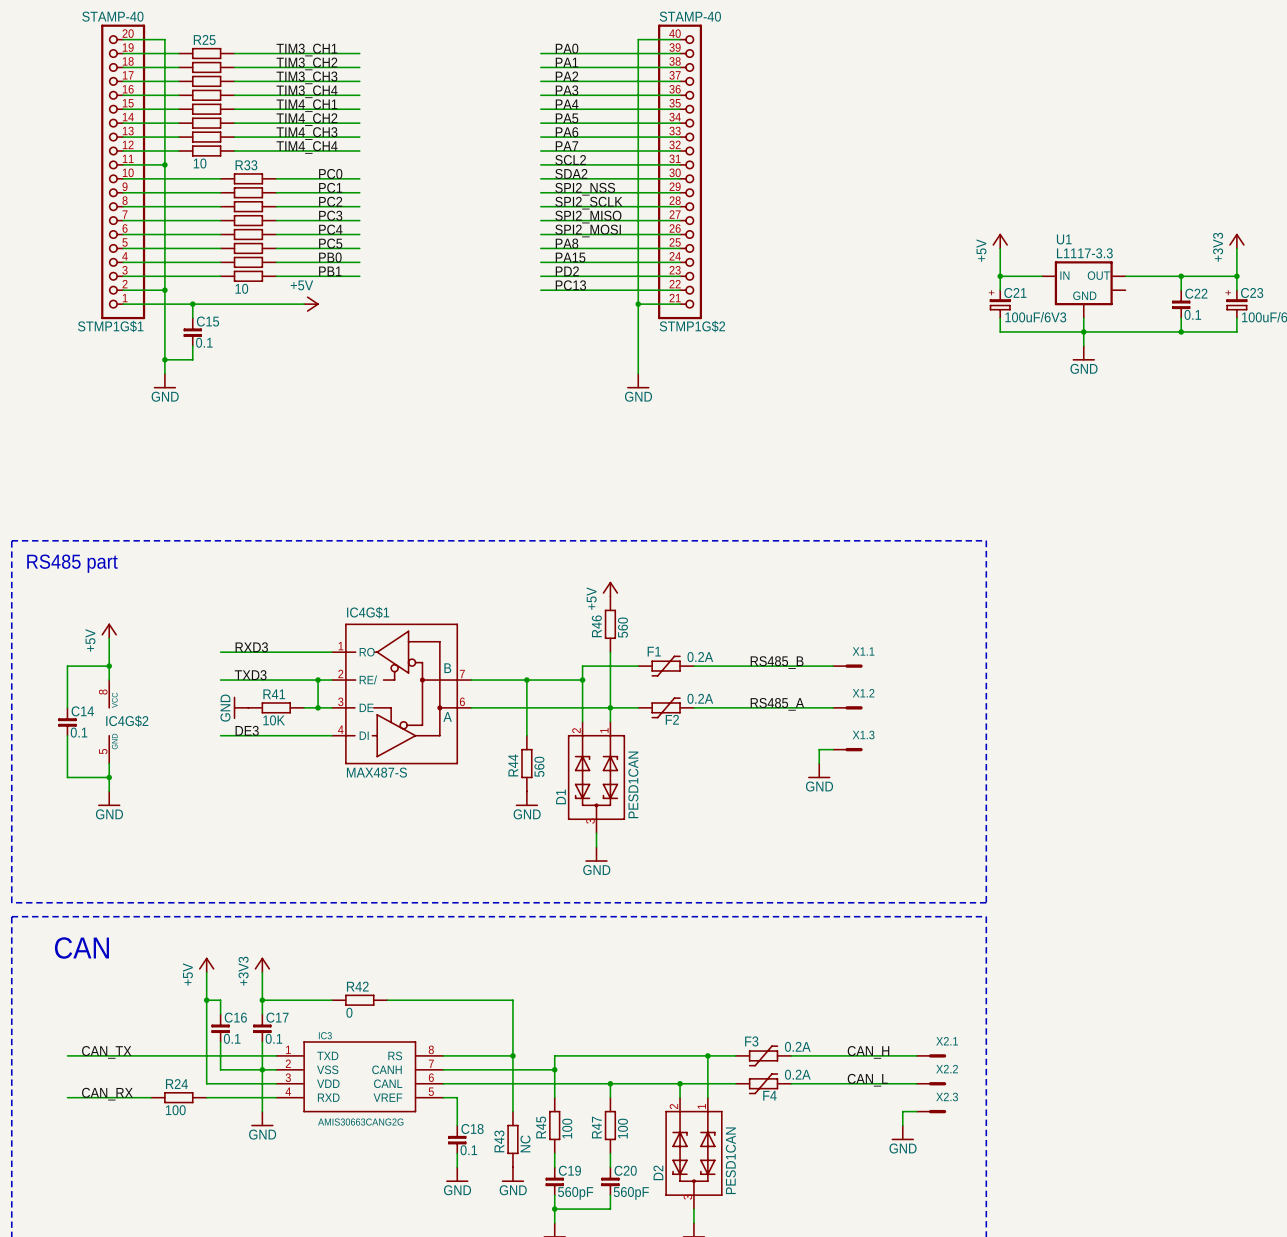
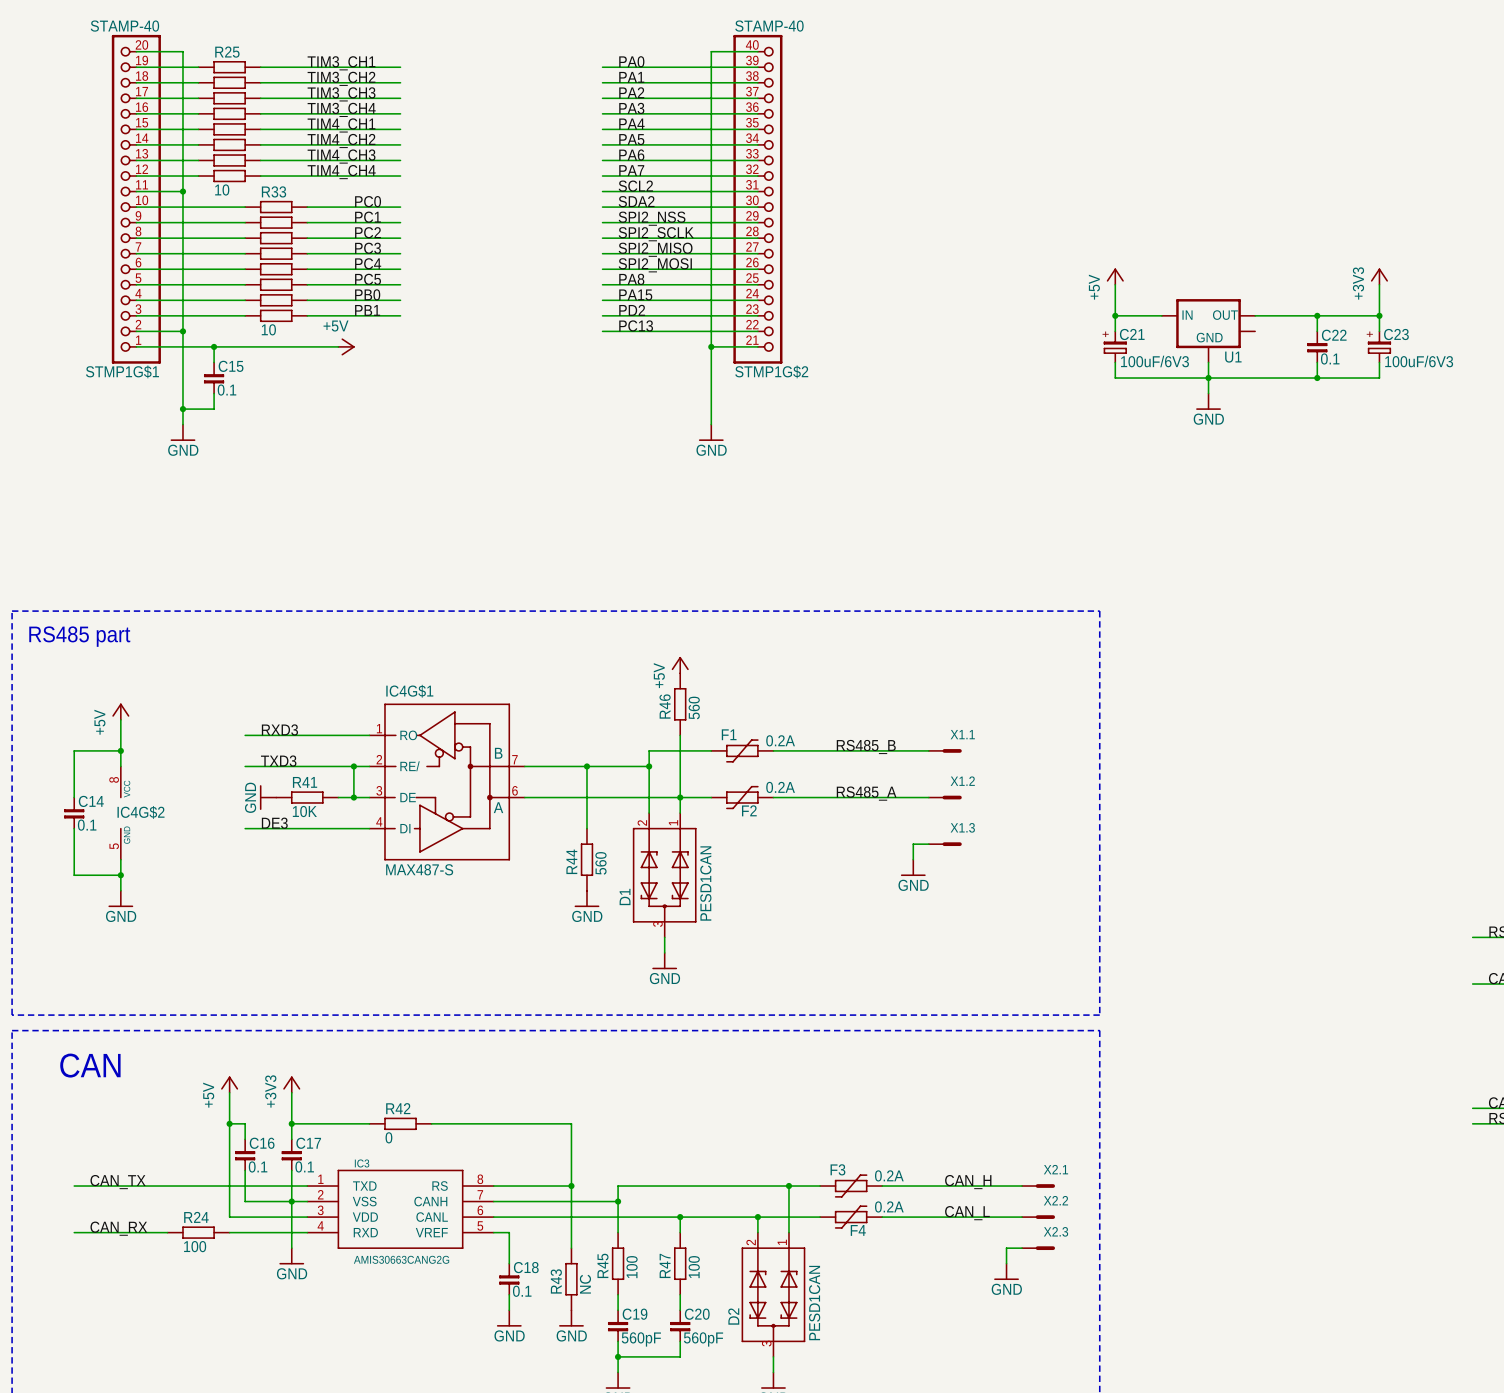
U1 name position: U1 (1064, 239) -> U1 (1233, 357)
U1 value: L1117-3.3 (1084, 253) -> none

